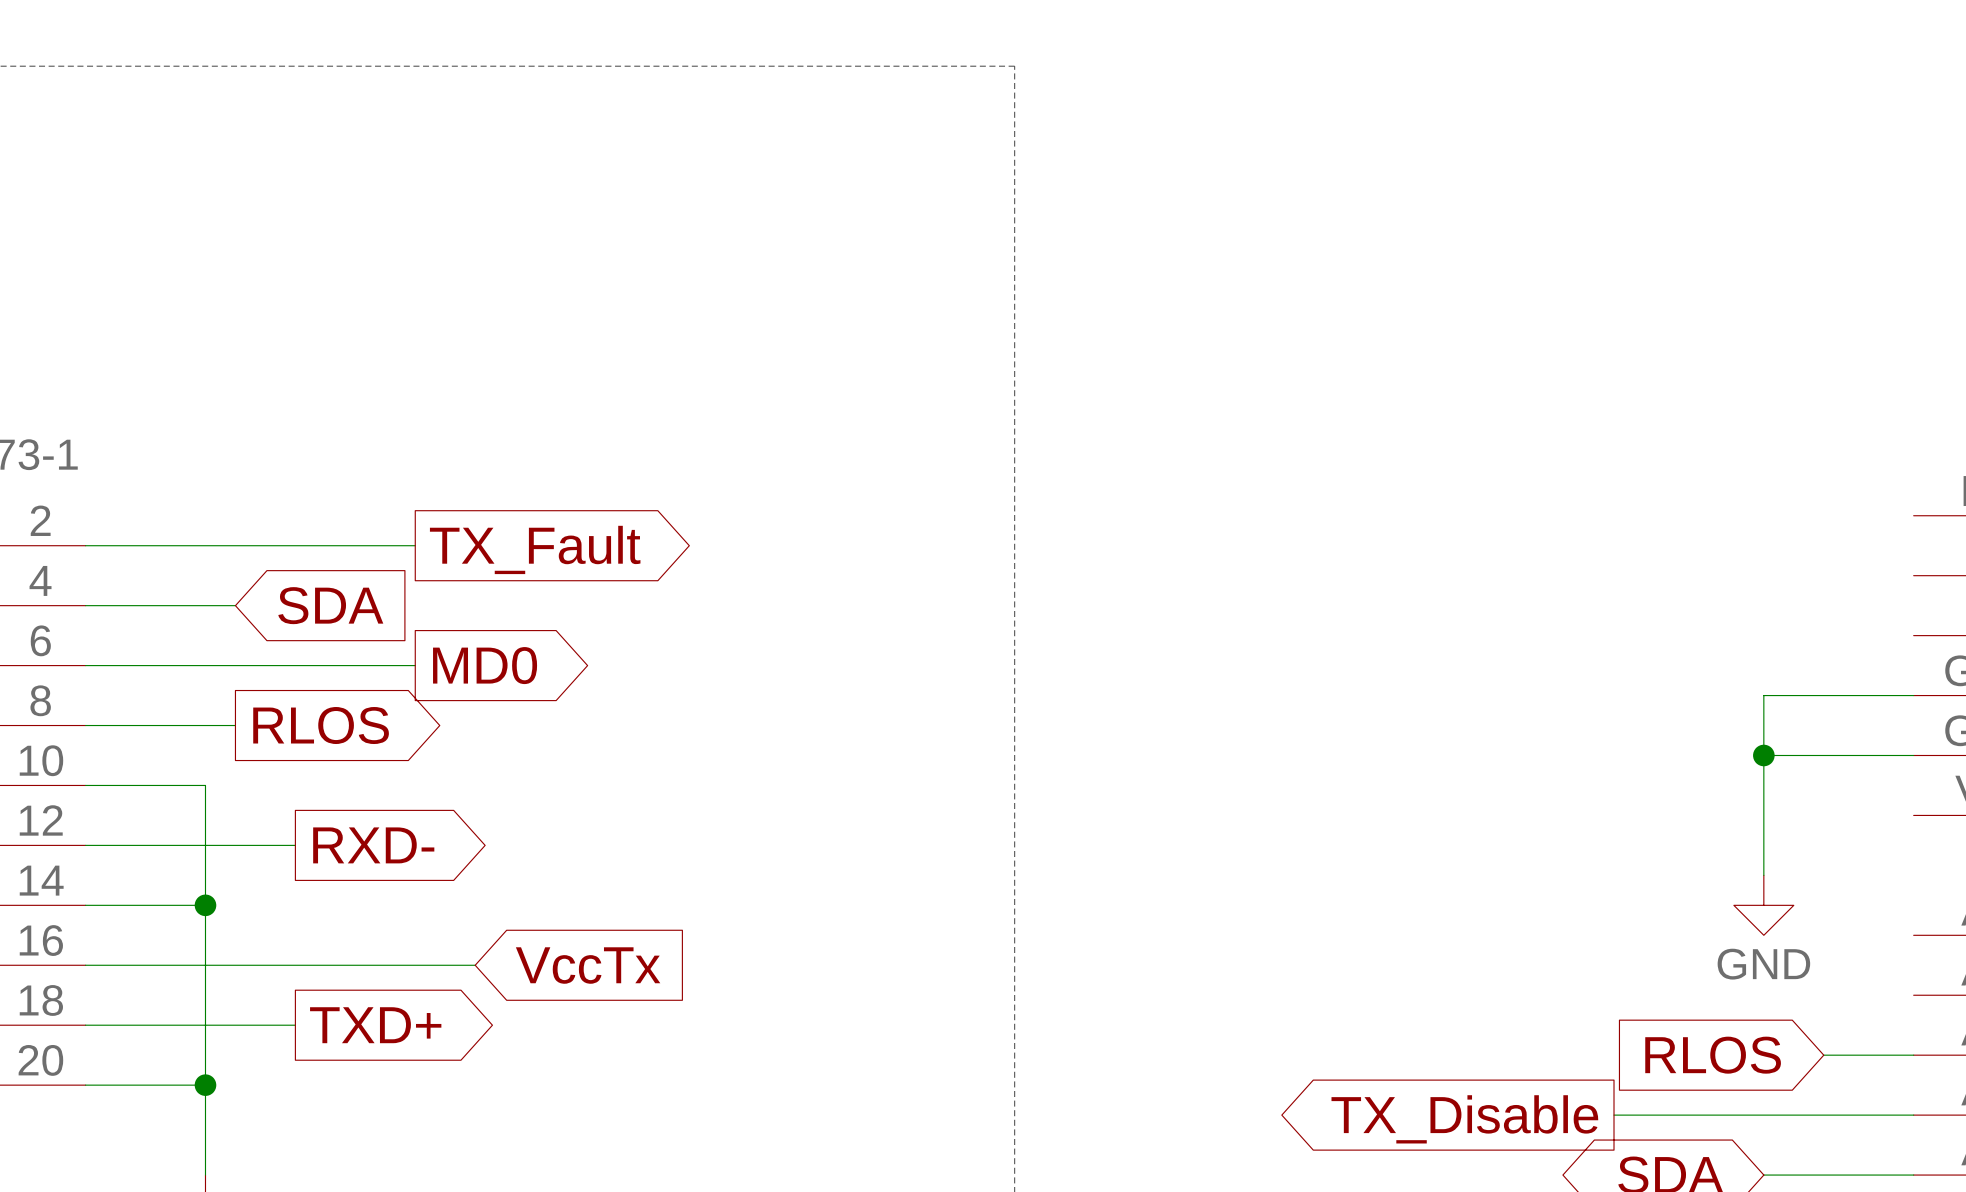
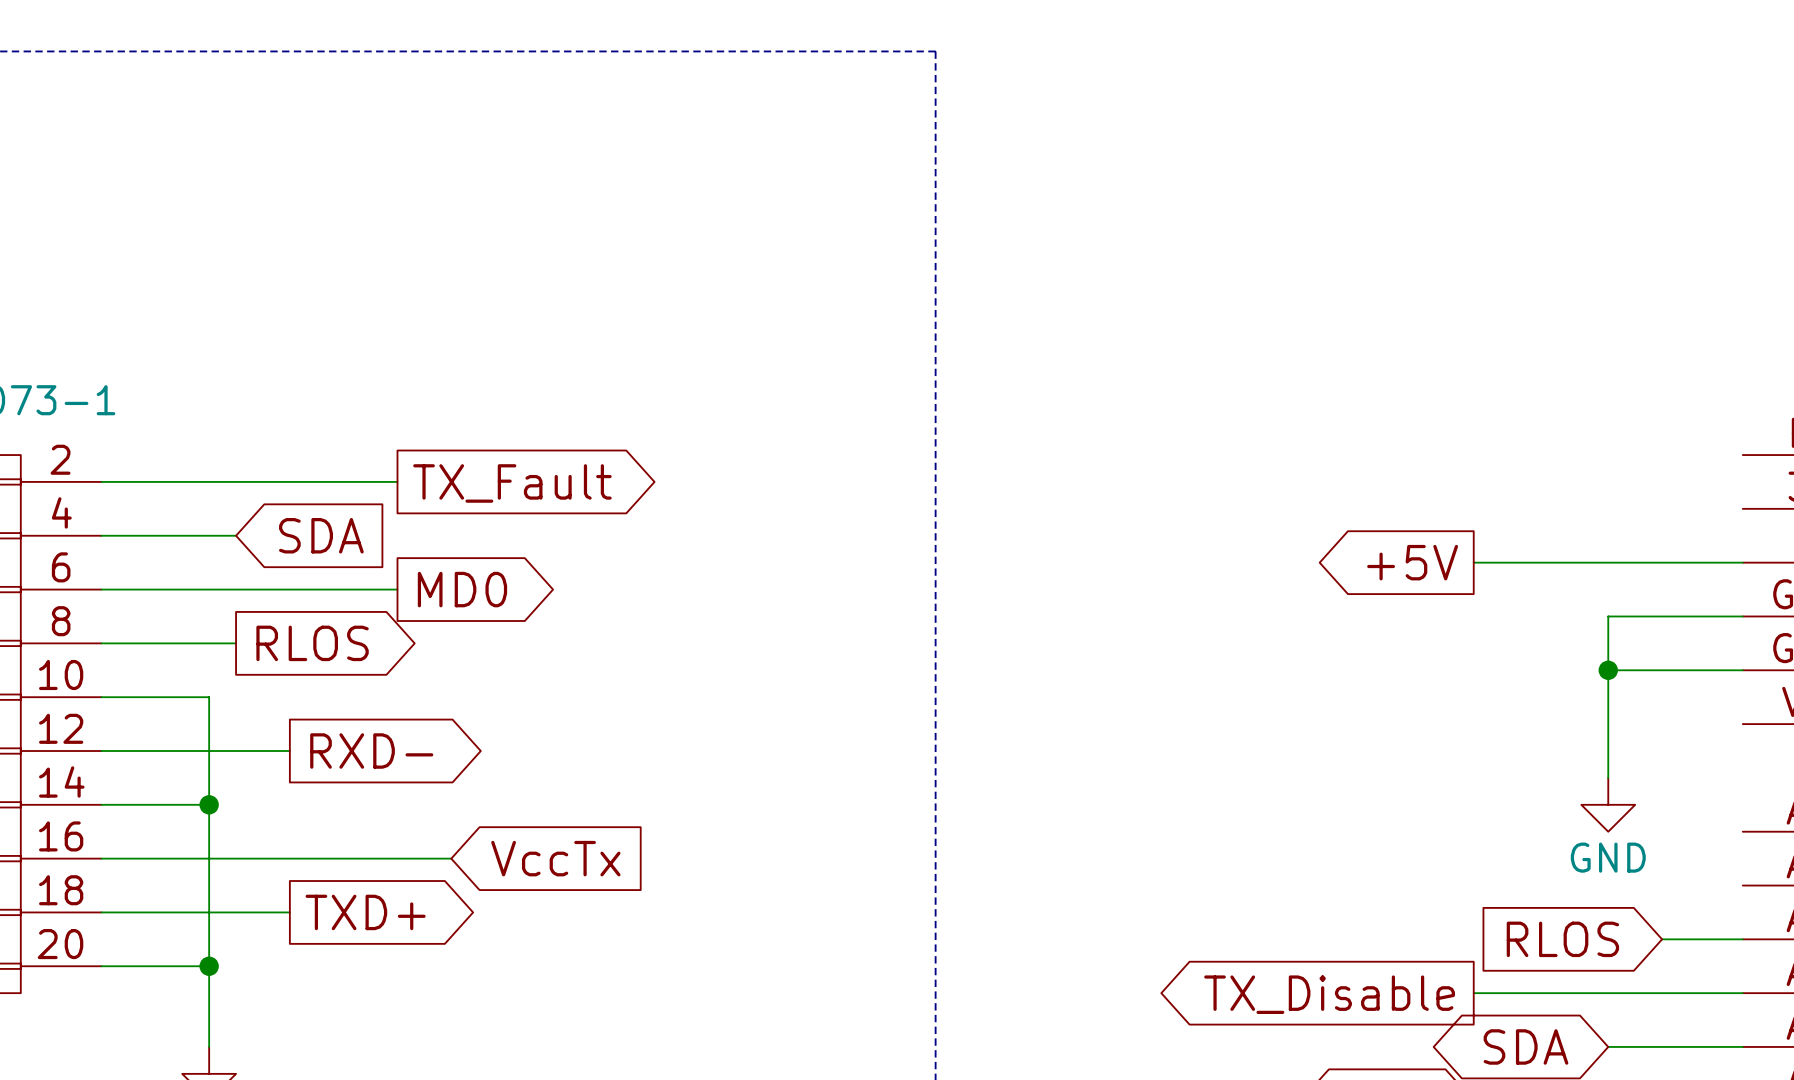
global label: none -> +5V (1412, 562)
wire: none -> (1473, 562) (1742, 562)

